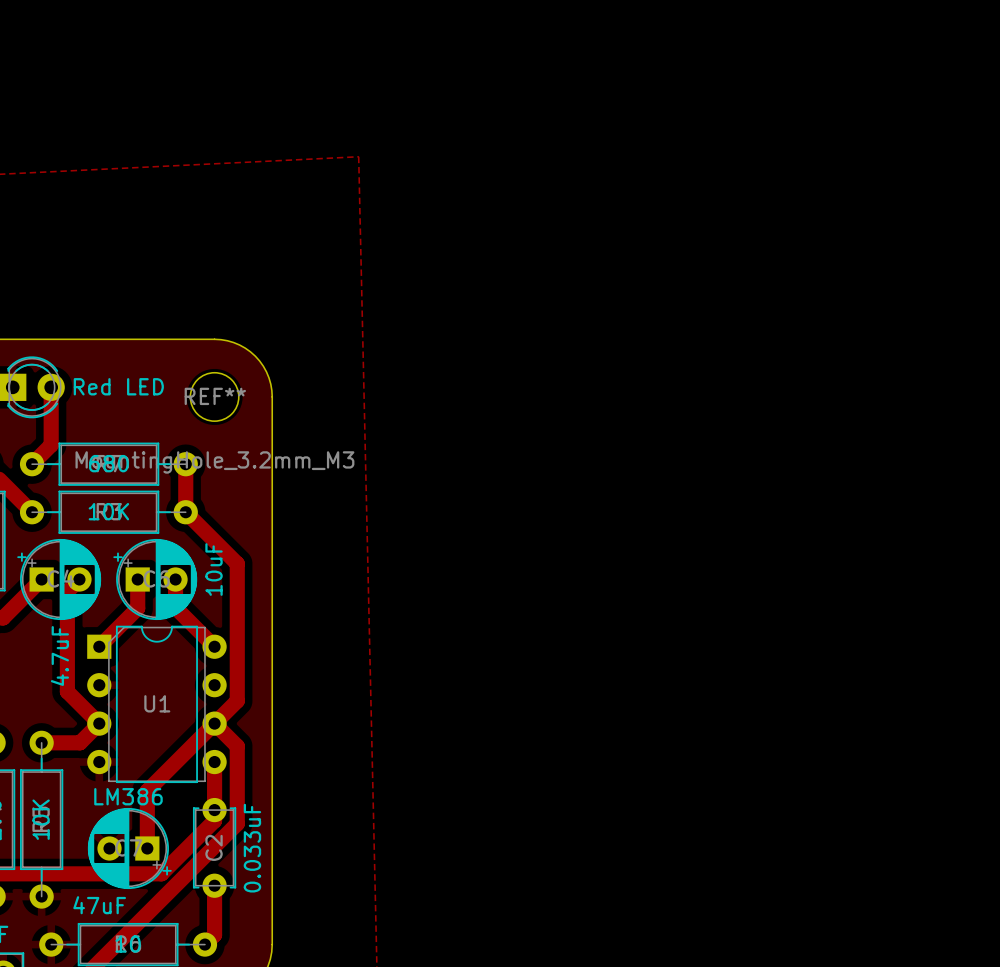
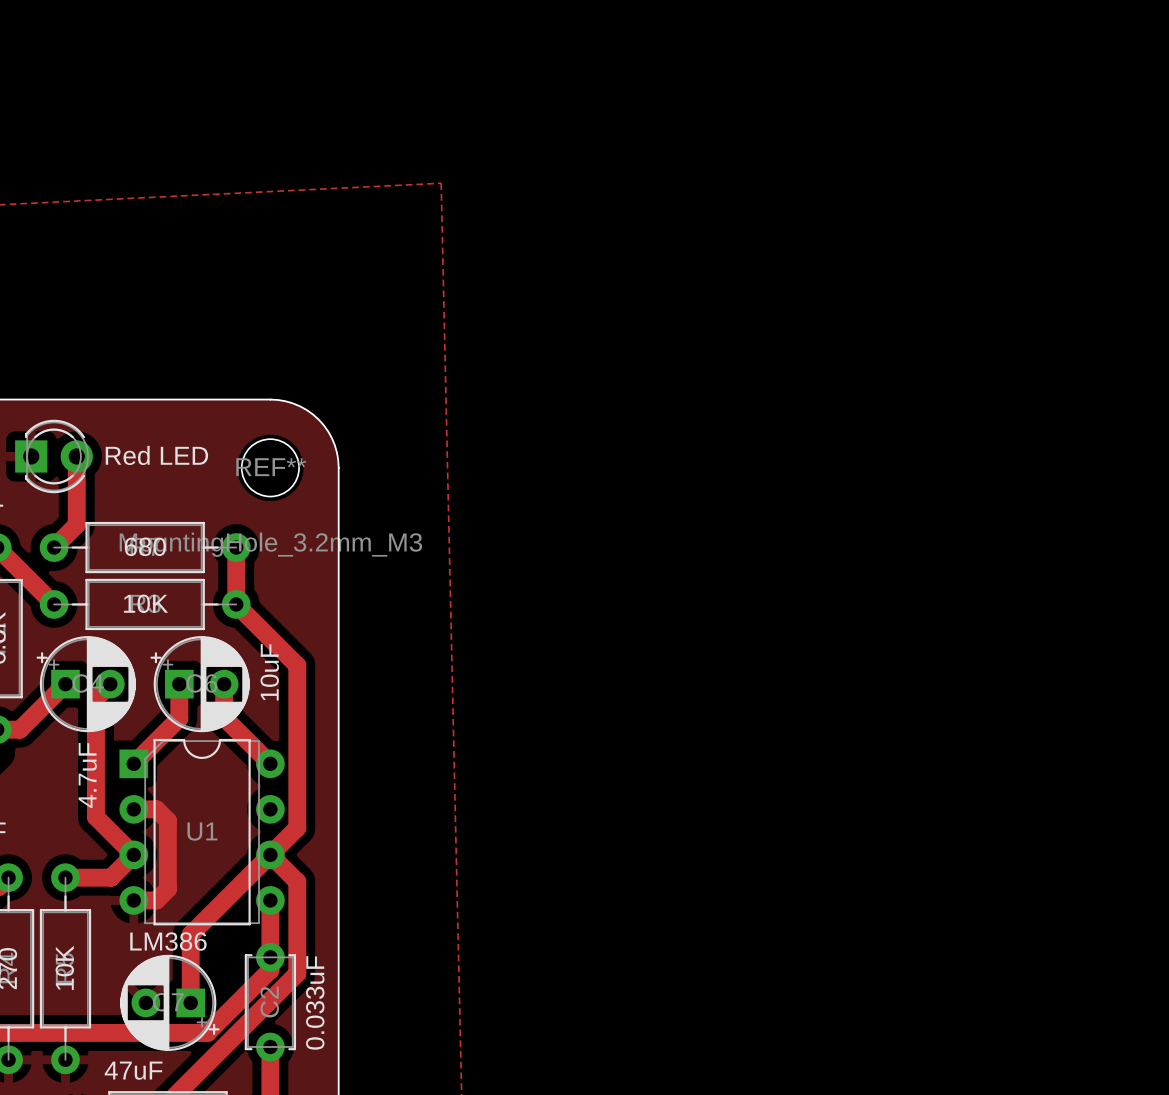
track: none -> (133, 809) (156, 809) (167, 820) (167, 889) (156, 900) (133, 900)

